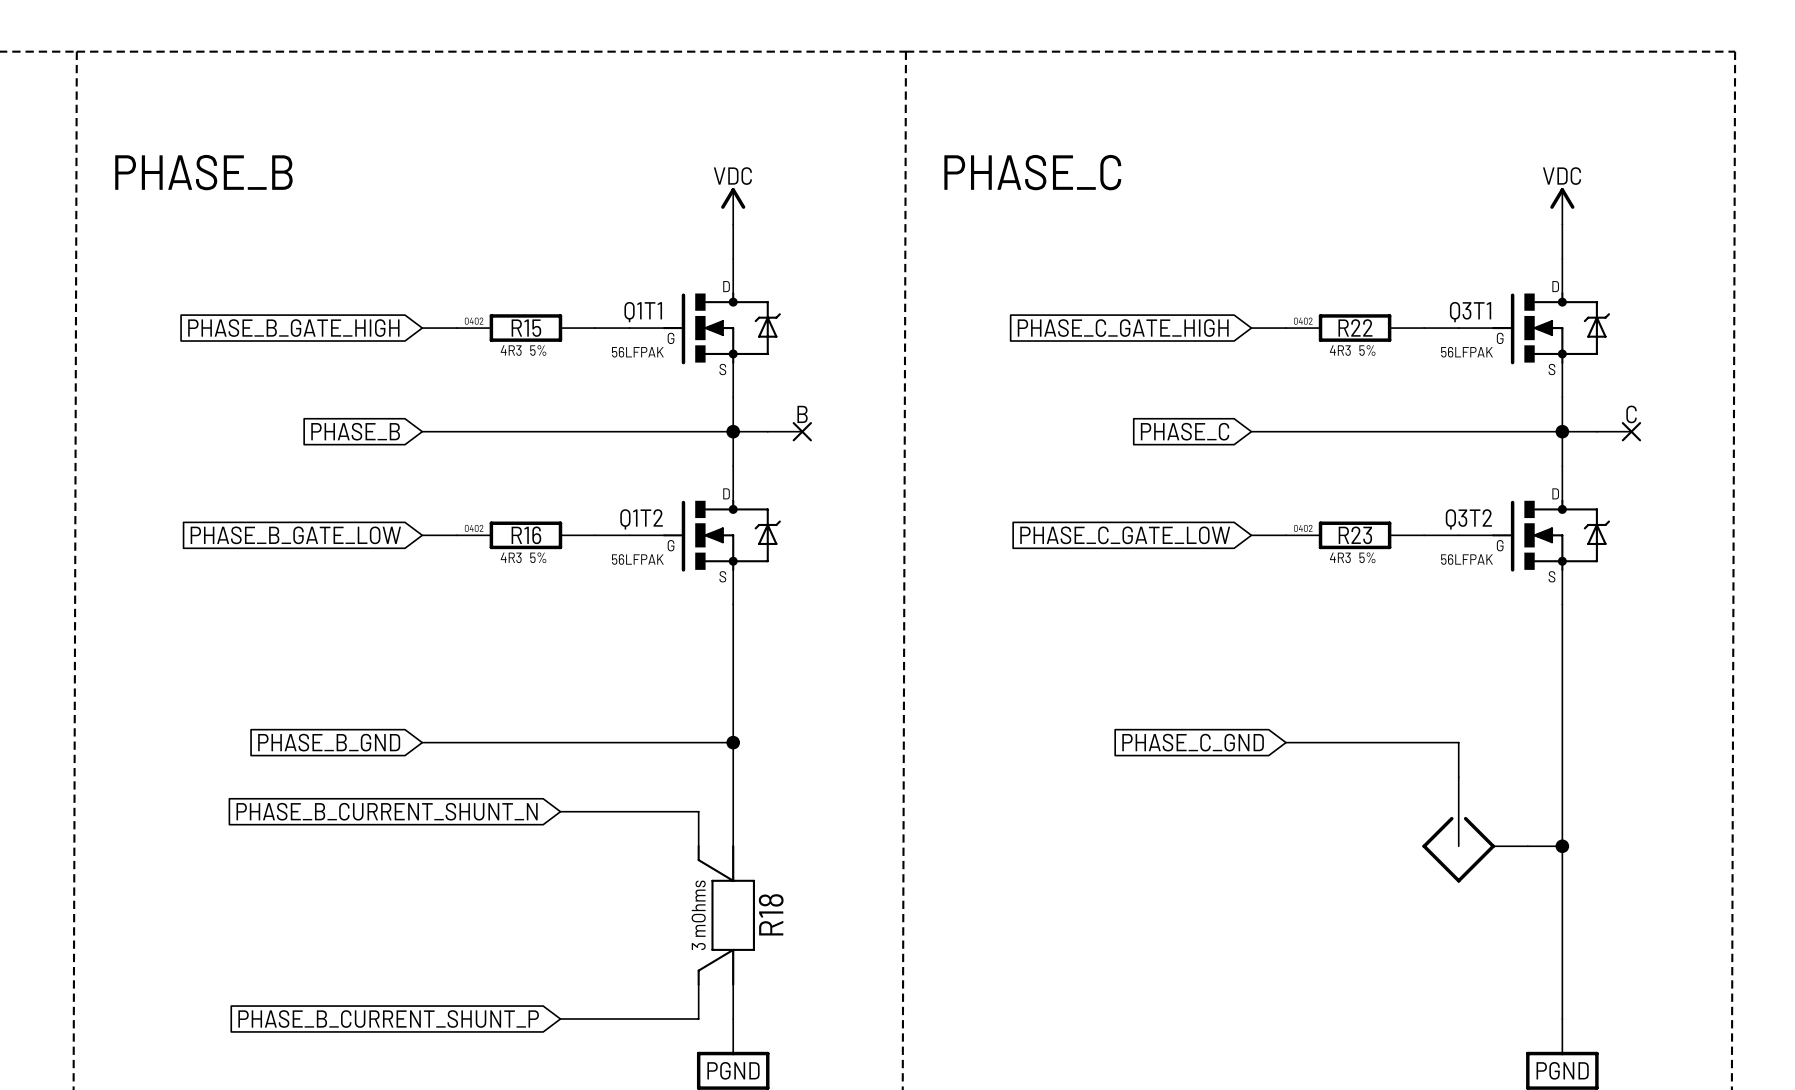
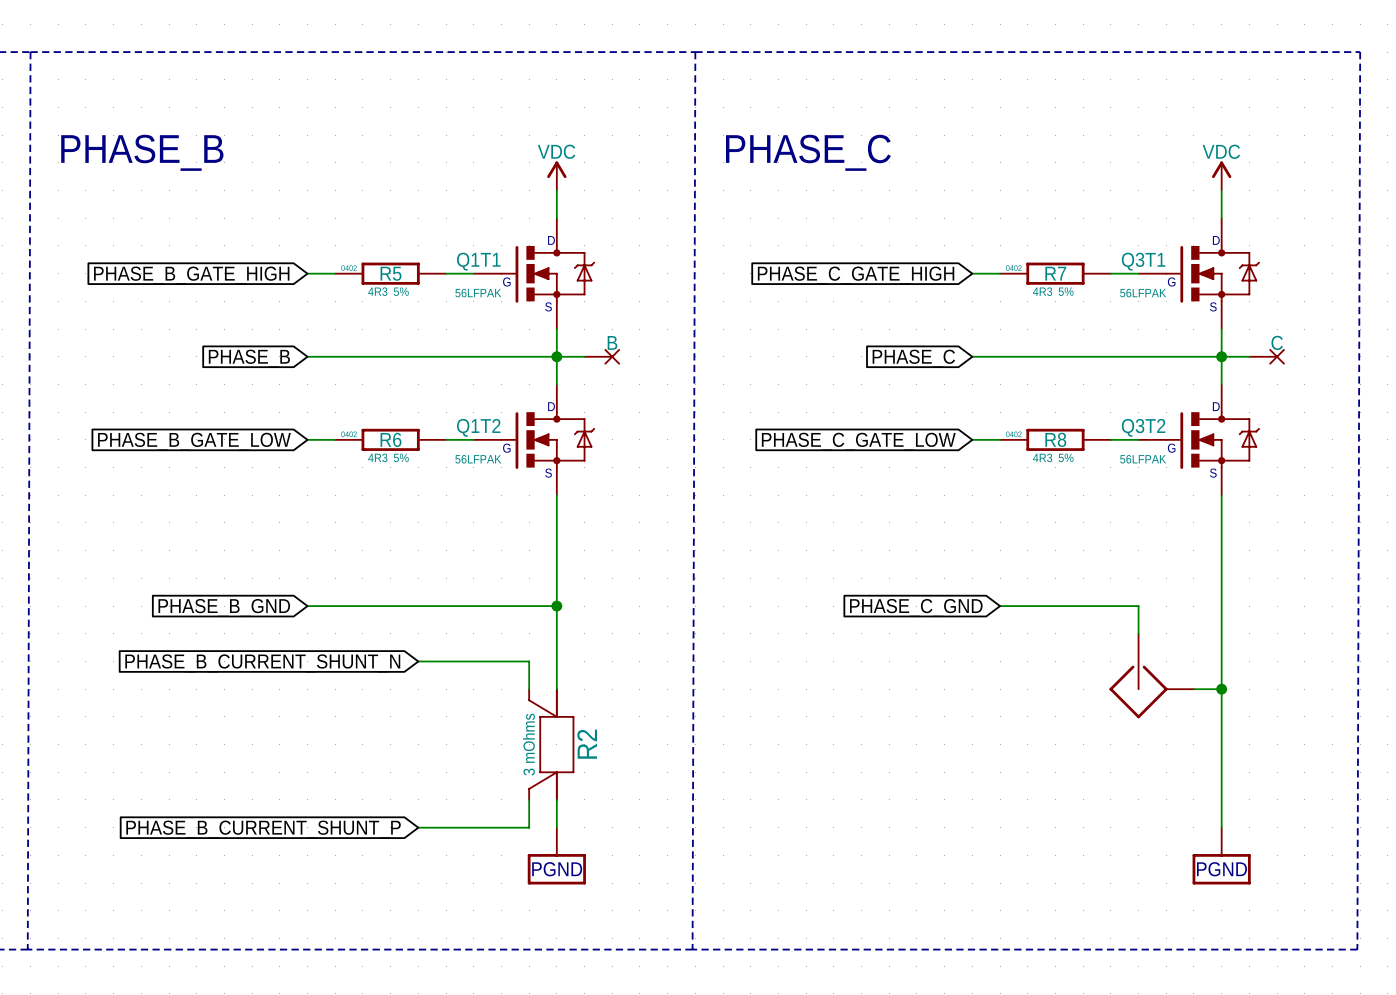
R22 name: R22 (1355, 327) -> R7 (1055, 273)
R15 name: R15 (526, 328) -> R5 (391, 273)
R16 name: R16 (526, 535) -> R6 (390, 439)
R23 name: R23 (1355, 535) -> R8 (1055, 439)
R18 name: R18 (771, 914) -> R2 (587, 744)

